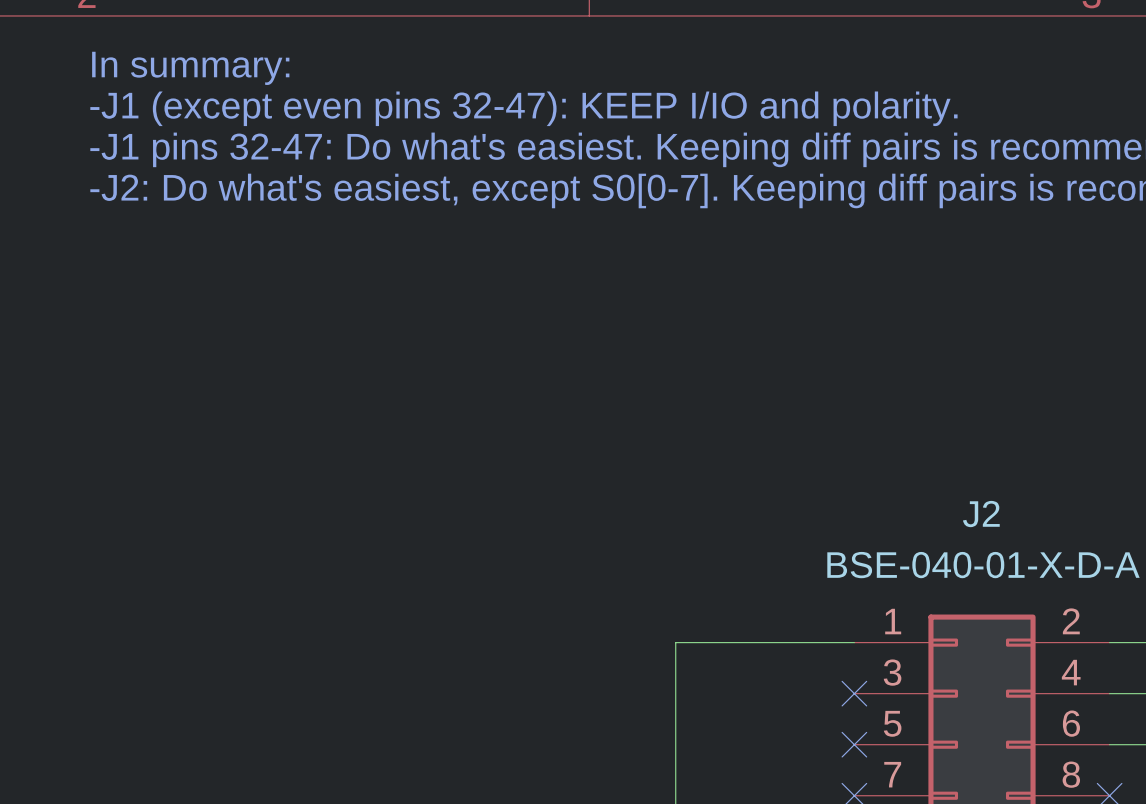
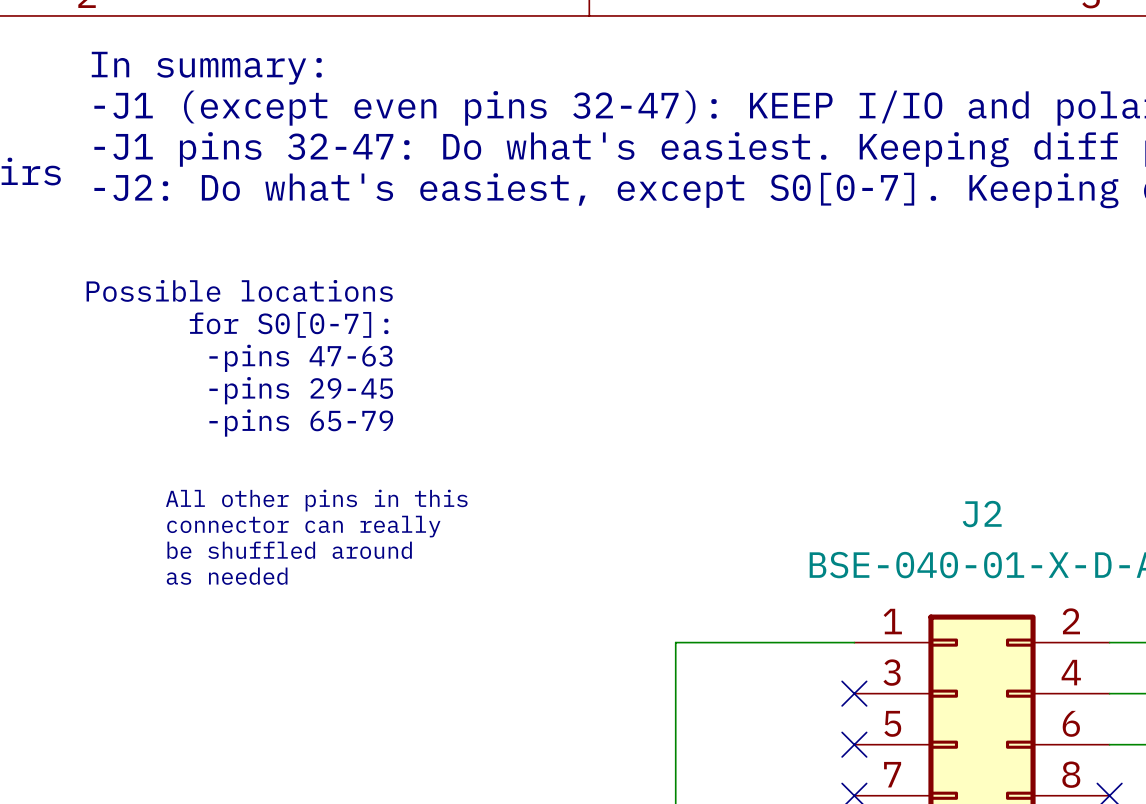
text: none -> Possible locations (239, 290)
text: none -> for S0[0-7]: (289, 324)
text: none -> -pins 47-63 (301, 358)
text: none -> -pins 29-45 (301, 390)
text: none -> -pins 65-79 (301, 423)
text: none -> All other pins in this (316, 500)
text: none -> connector can really (303, 526)
text: none -> be shuffled around (289, 550)
text: none -> as needed (227, 576)

